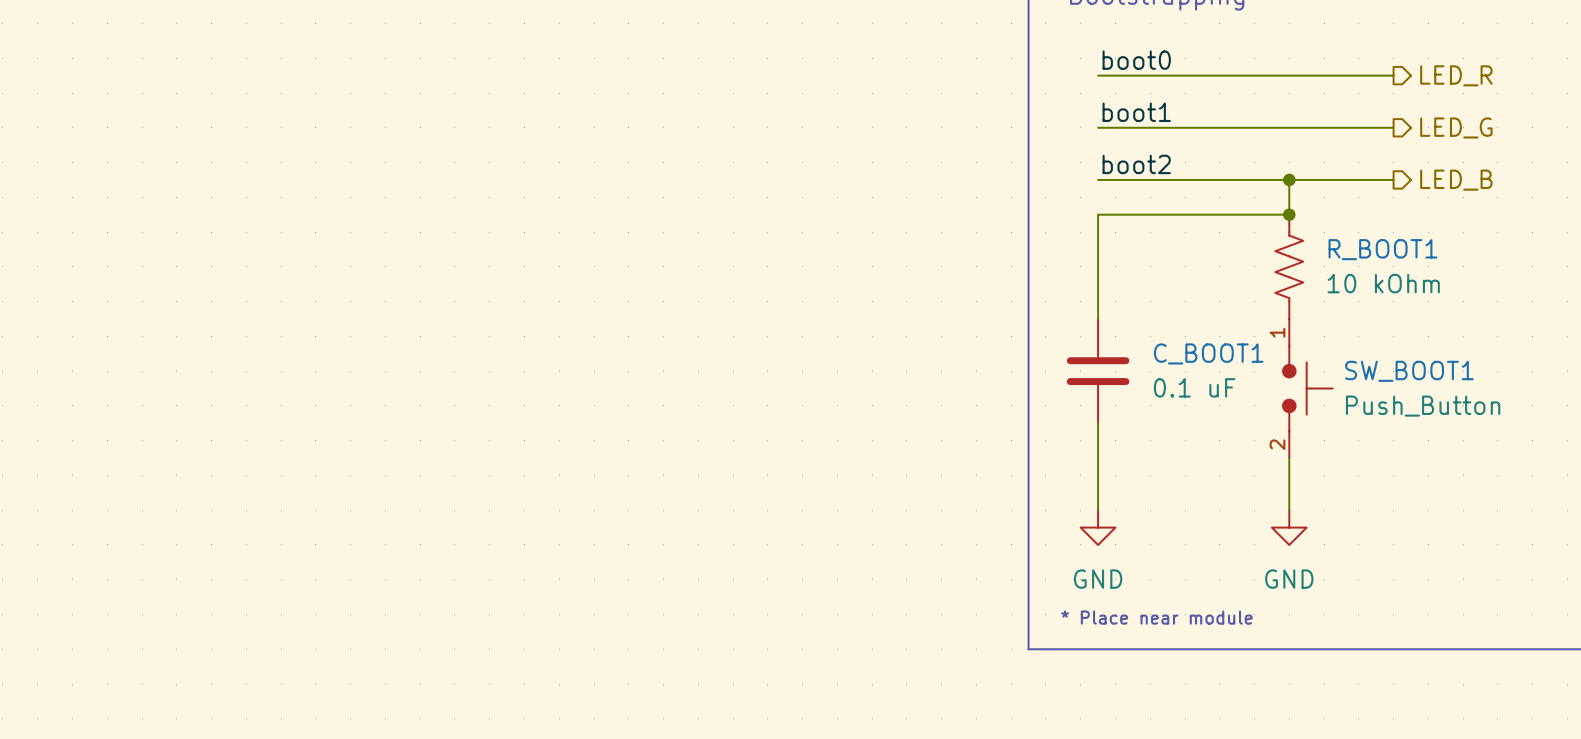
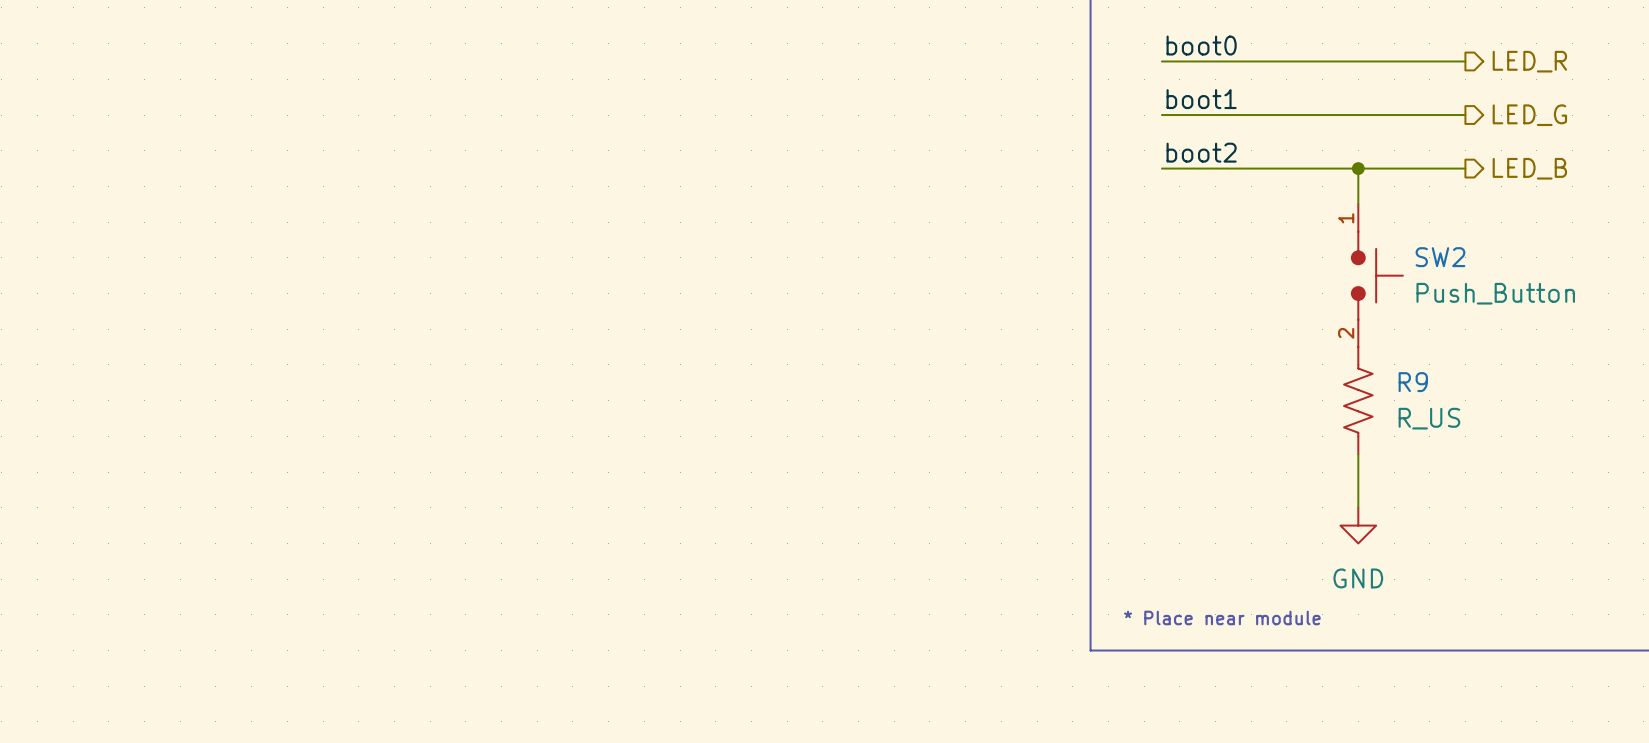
wire: (1289, 214) (1098, 214) (1098, 319) -> none
junction: (1289, 214) -> none
R_BOOT1: 10 kOhm (1289, 266) -> none
SW2: none -> Push_Button (1377, 275)
C_BOOT1: 0.1 uF (1098, 371) -> none
SW_BOOT1: Push_Button (1307, 388) -> none
R9: none -> R_US (1358, 400)
wire: (1098, 423) (1098, 510) -> none
power symbol: GND (1098, 527) -> none

